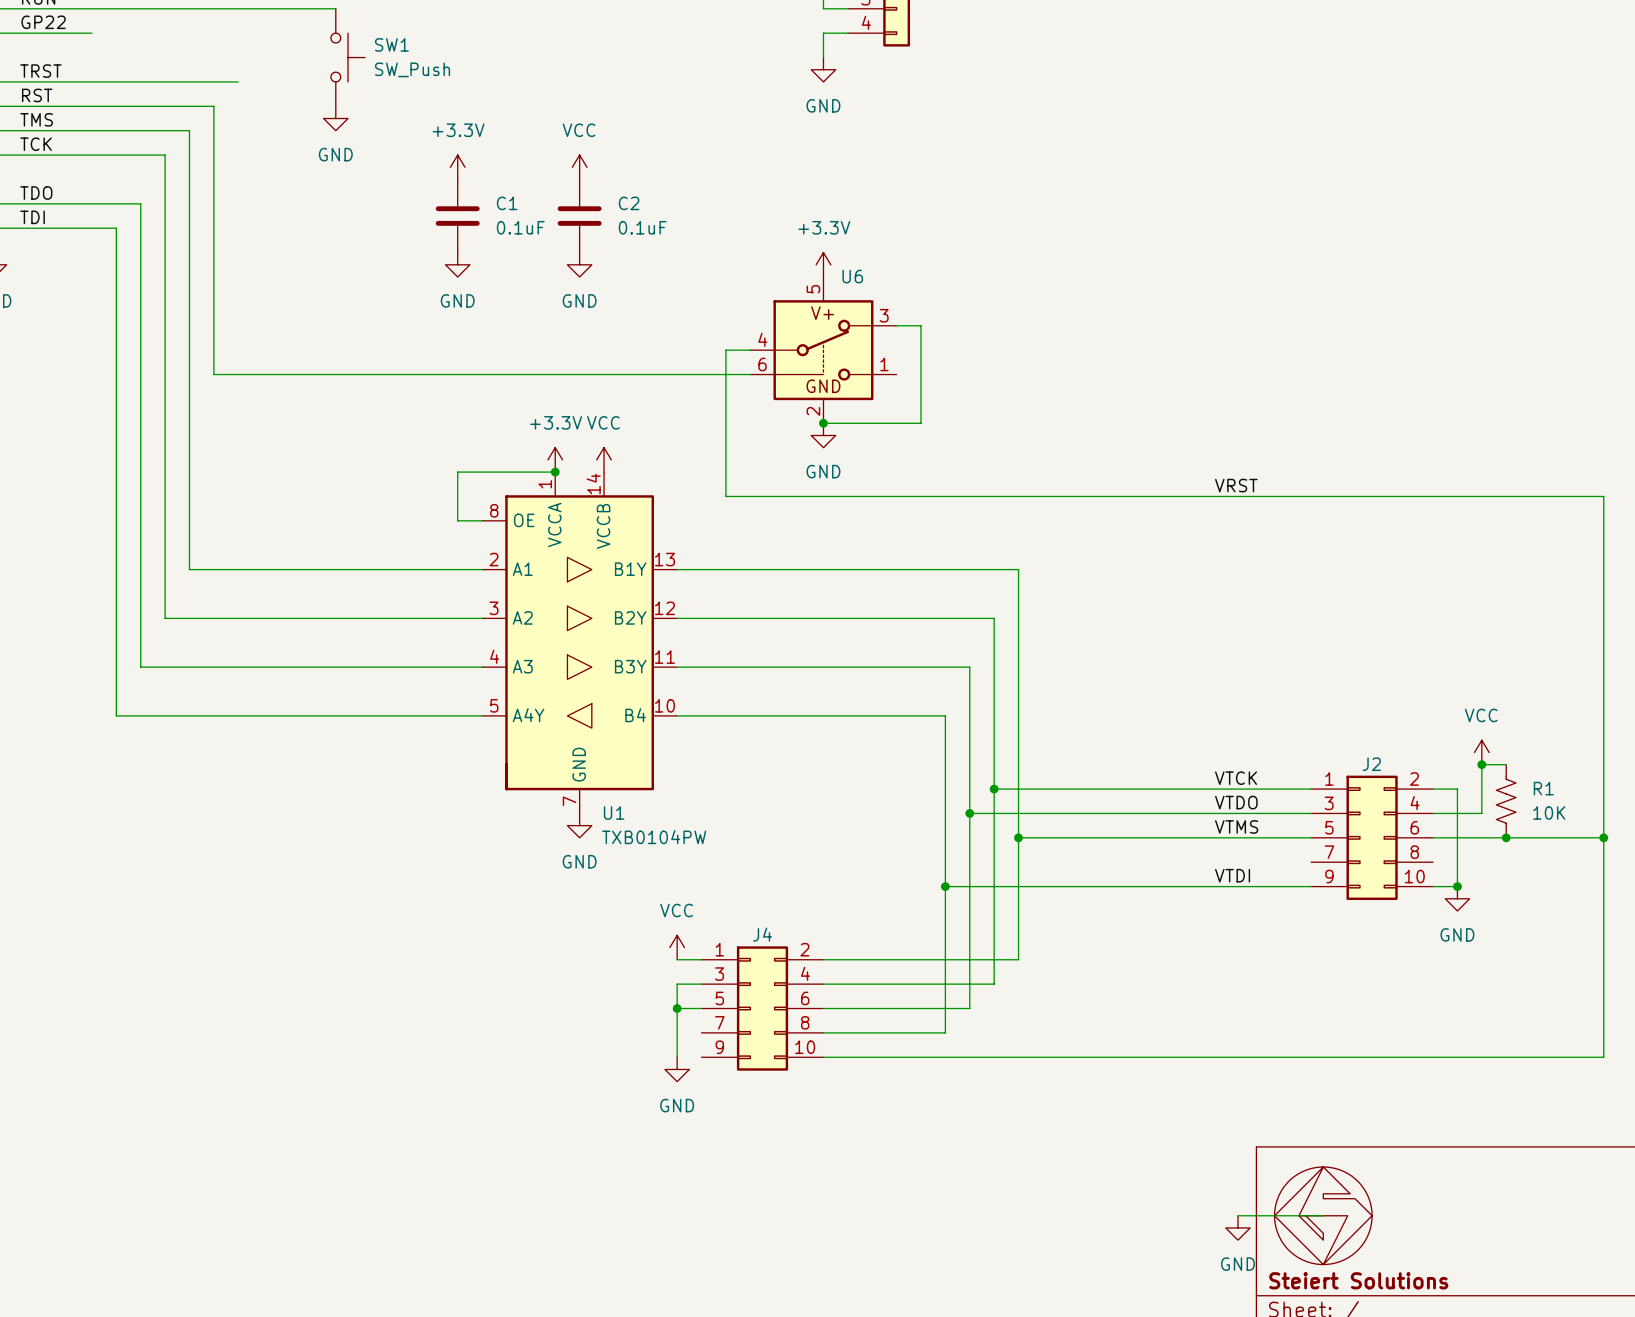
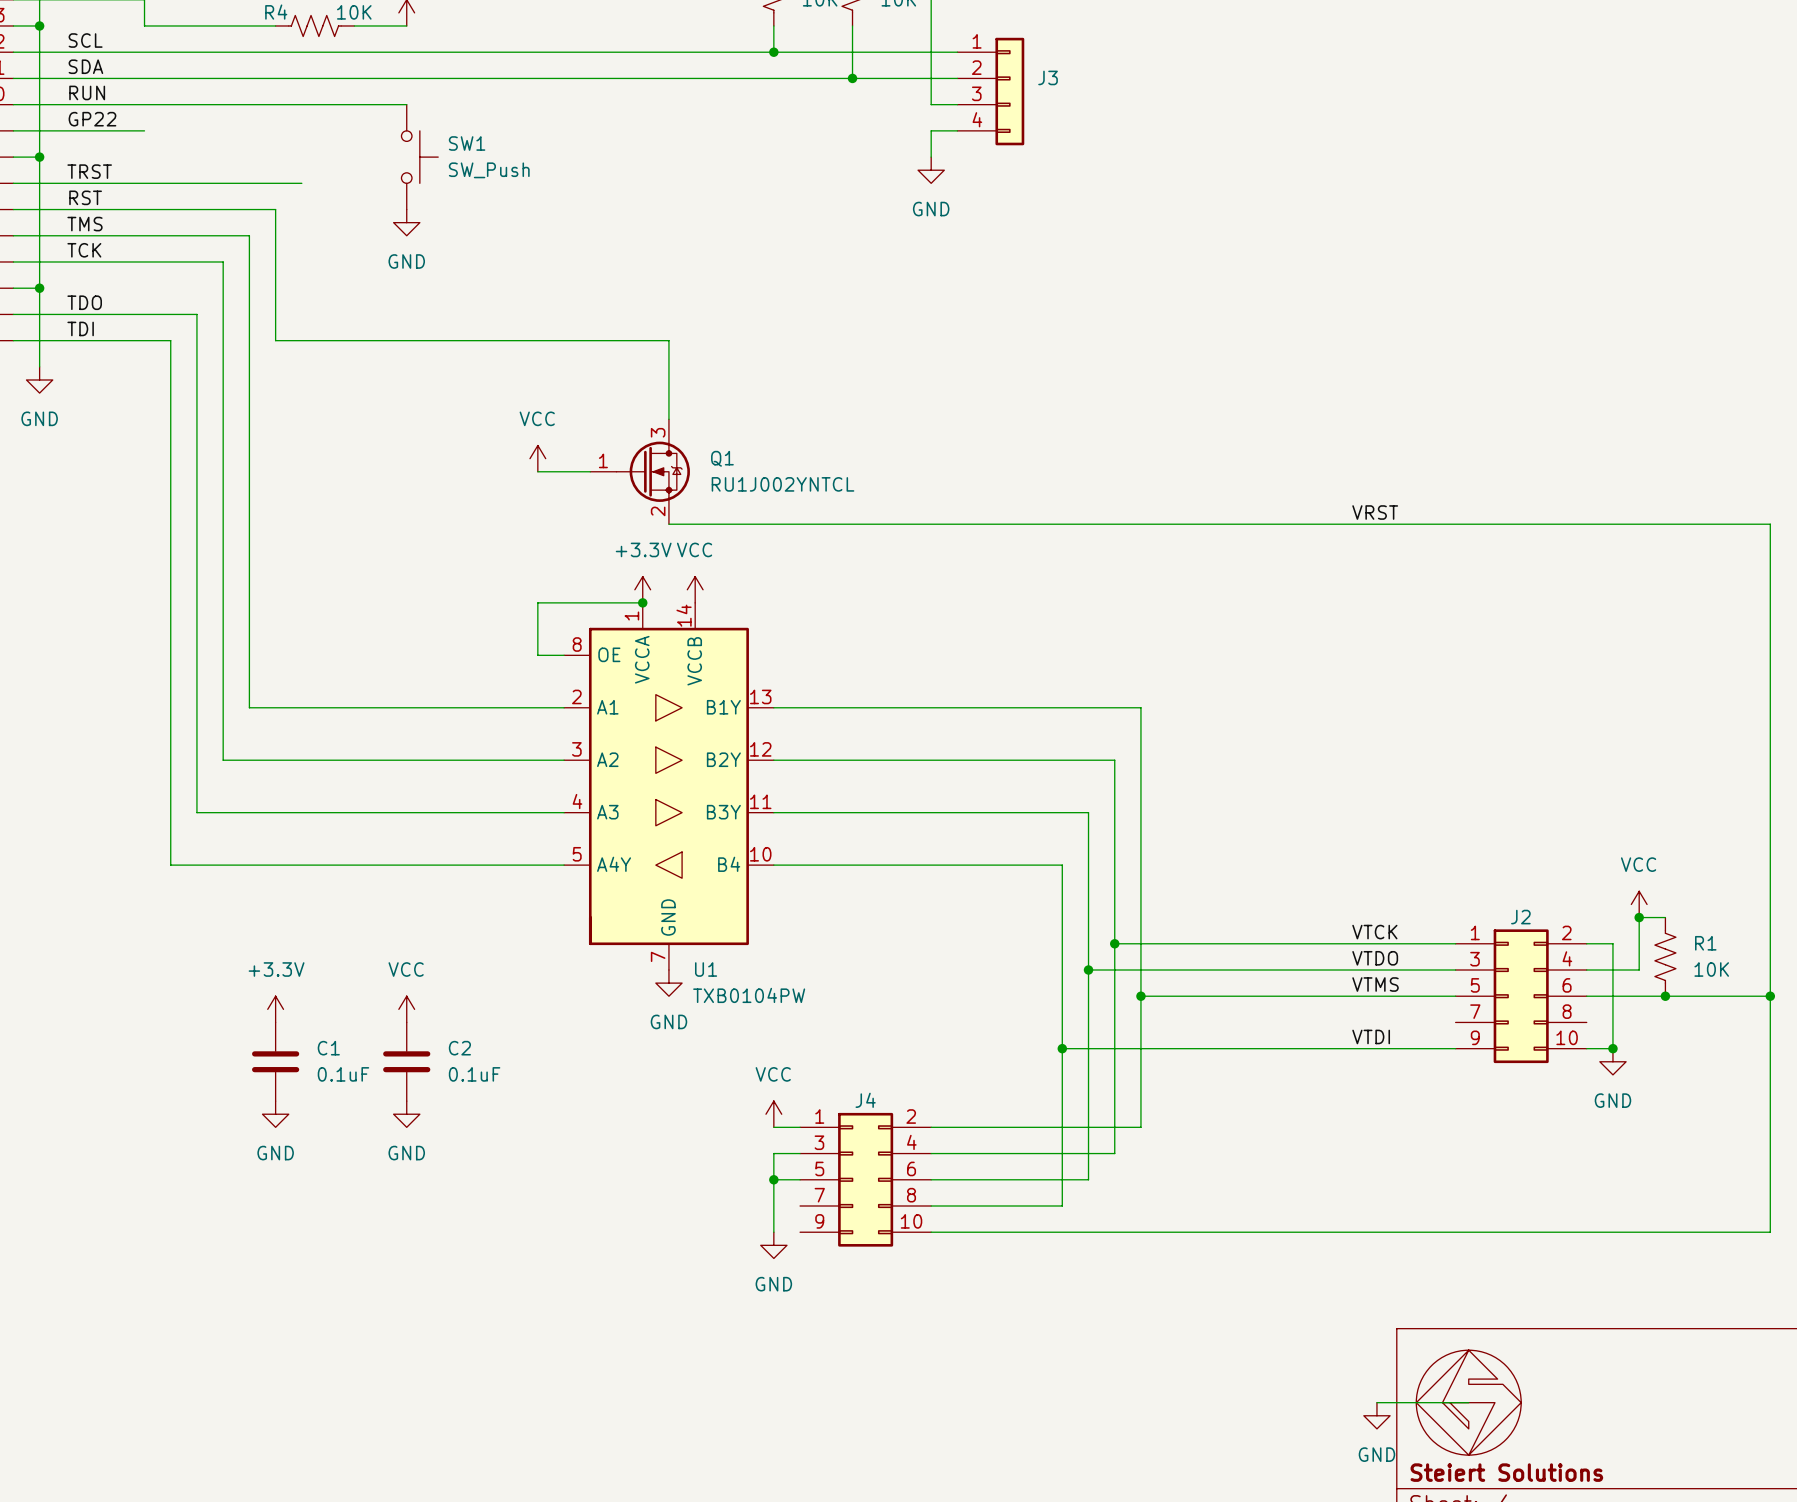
power symbol: +3.3V (457, 167) -> none
power symbol position: VCC (579, 167) -> VCC (537, 458)
C1 position: (457, 216) -> (275, 1061)
C2 position: (579, 216) -> (406, 1061)
wire: (213, 228) (213, 374) (750, 374) -> (275, 340) (668, 340) (668, 419)
power symbol: GND (457, 264) -> none
power symbol: GND (579, 264) -> none
power symbol: +3.3V (823, 264) -> none
wire: (896, 325) (921, 325) (921, 423) (823, 423) -> none
wire: none -> (537, 471) (590, 471)
Q1: none -> RU1J002YNTCL (640, 471)
wire: (750, 350) (725, 350) (725, 496) (1603, 496) -> (668, 524) (1770, 524) (1770, 629)
U6: (823, 350) -> none
junction: (823, 423) -> none
power symbol: GND (823, 435) -> none
label position: VRST (1236, 485) -> VRST (1375, 512)
power symbol: none -> +3.3V (275, 1009)
power symbol: none -> VCC (406, 1009)
power symbol: none -> GND (275, 1114)
power symbol: none -> GND (406, 1114)

